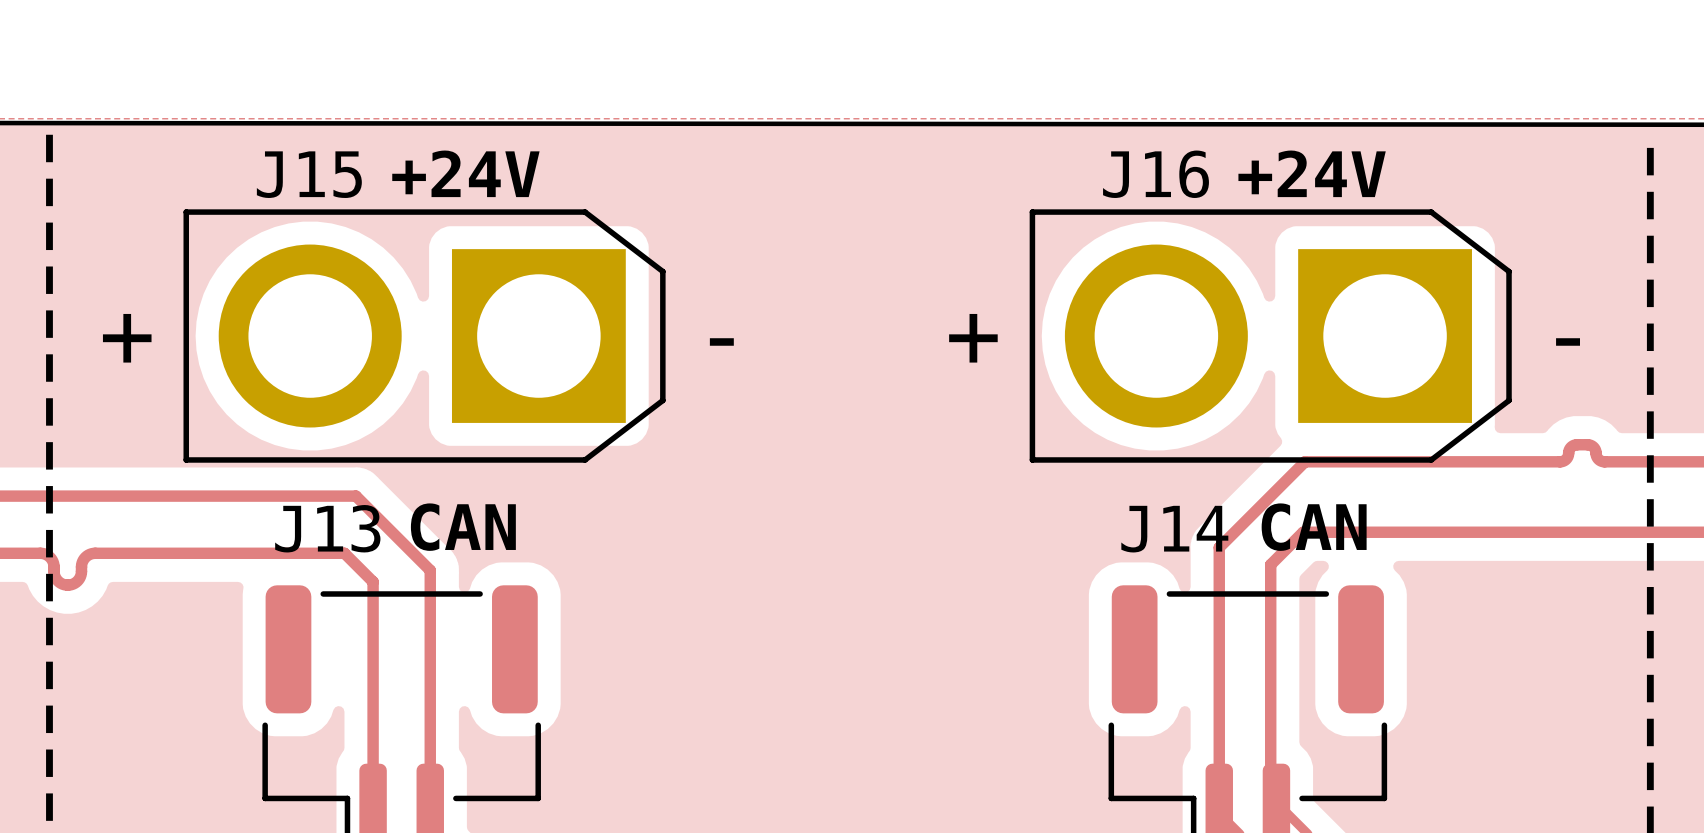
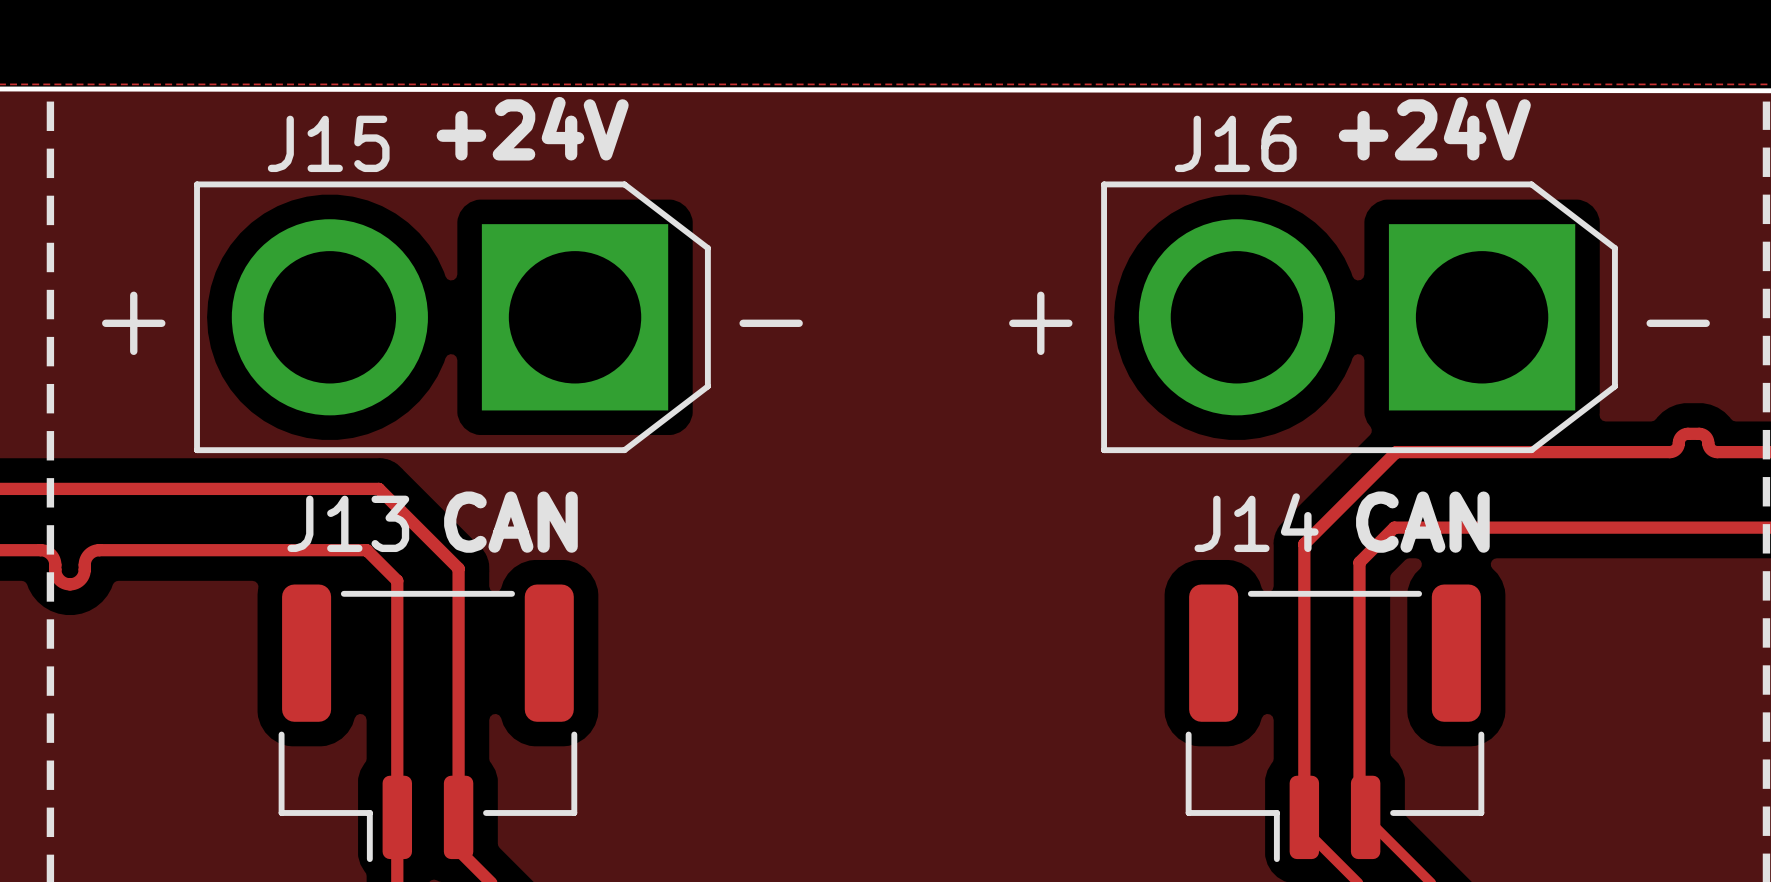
text position: +24V (465, 173) -> +24V (532, 128)
text position: +24V (1312, 173) -> +24V (1434, 128)

